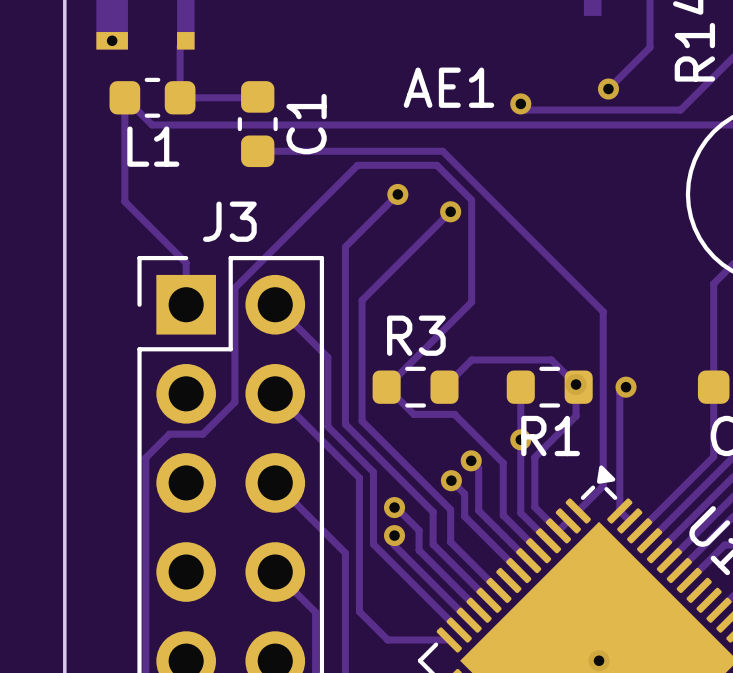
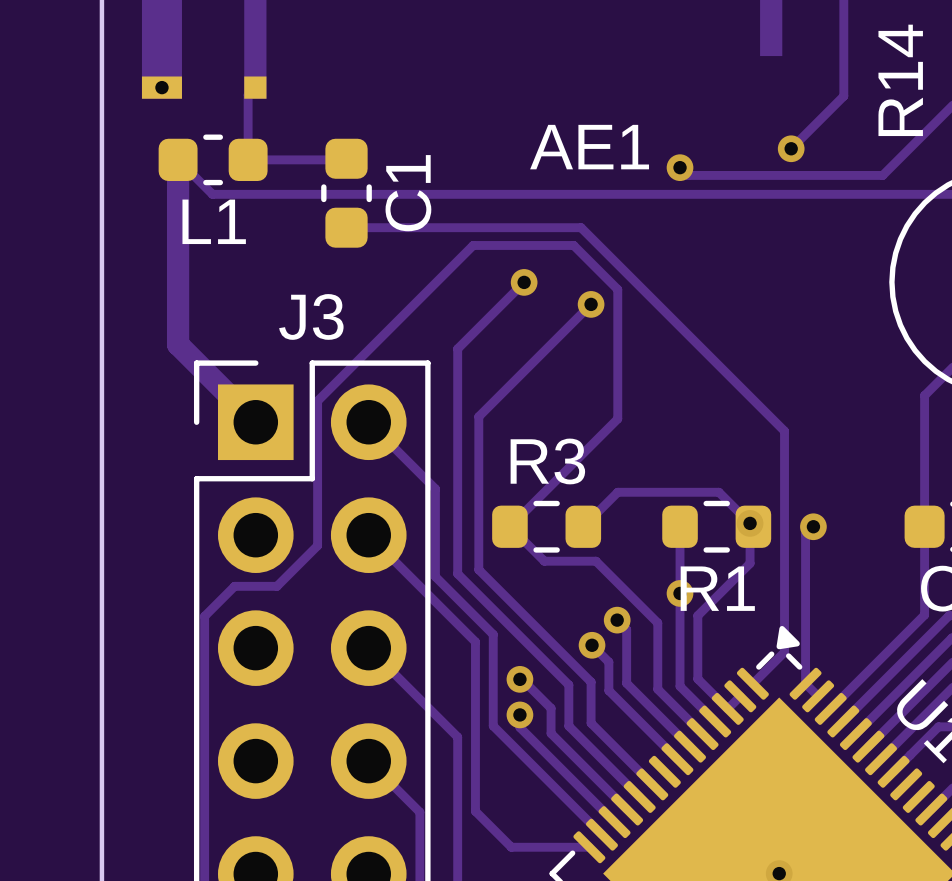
track width: thin (124, 97) (124, 201) -> thick (178, 159) (178, 291)
track: (124, 201) (186, 262) (186, 304) -> (178, 291) (178, 344) (255, 422)

